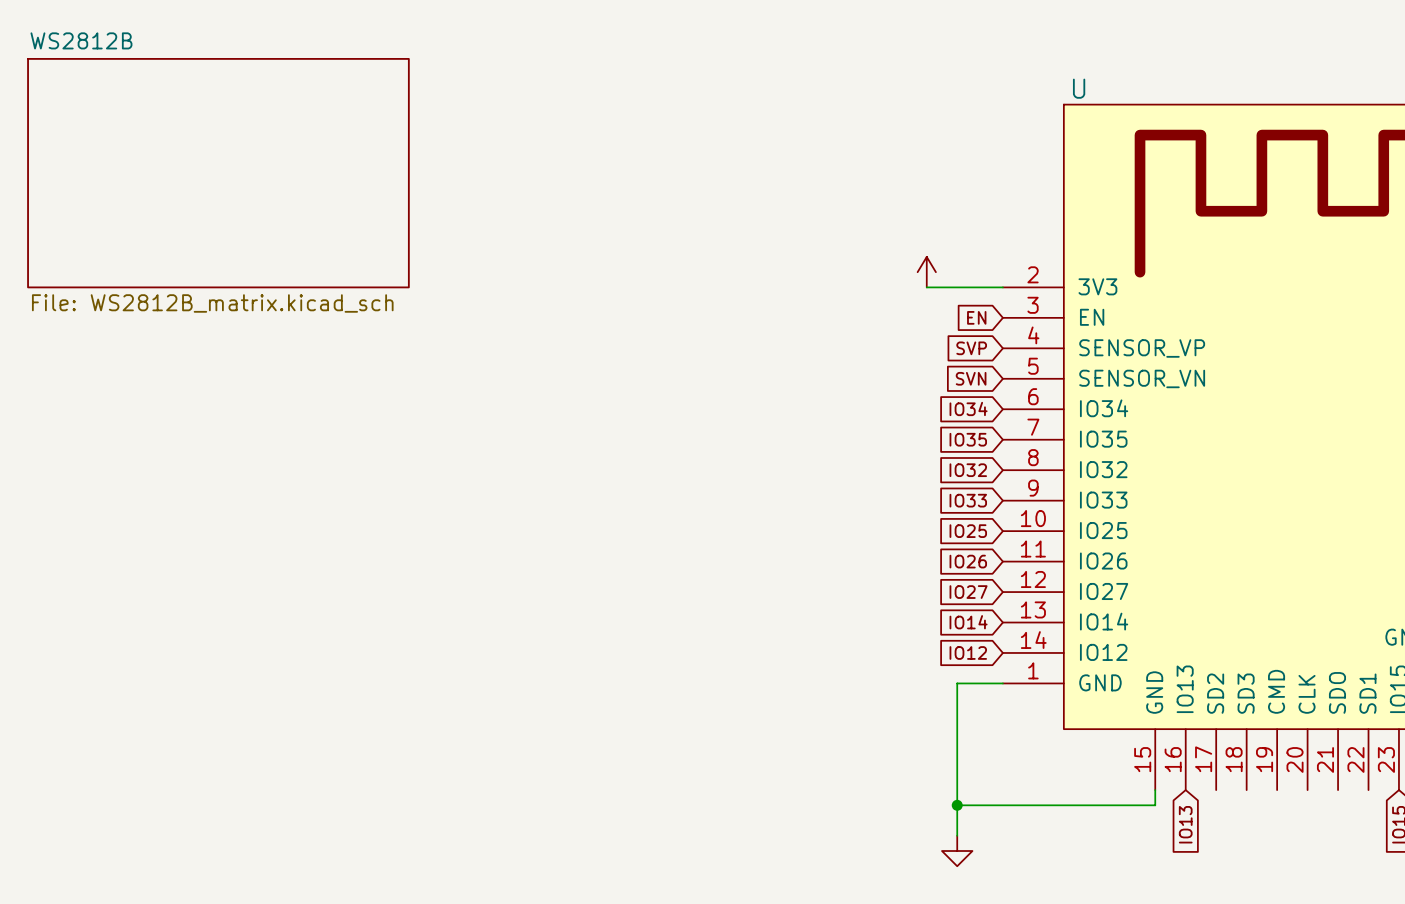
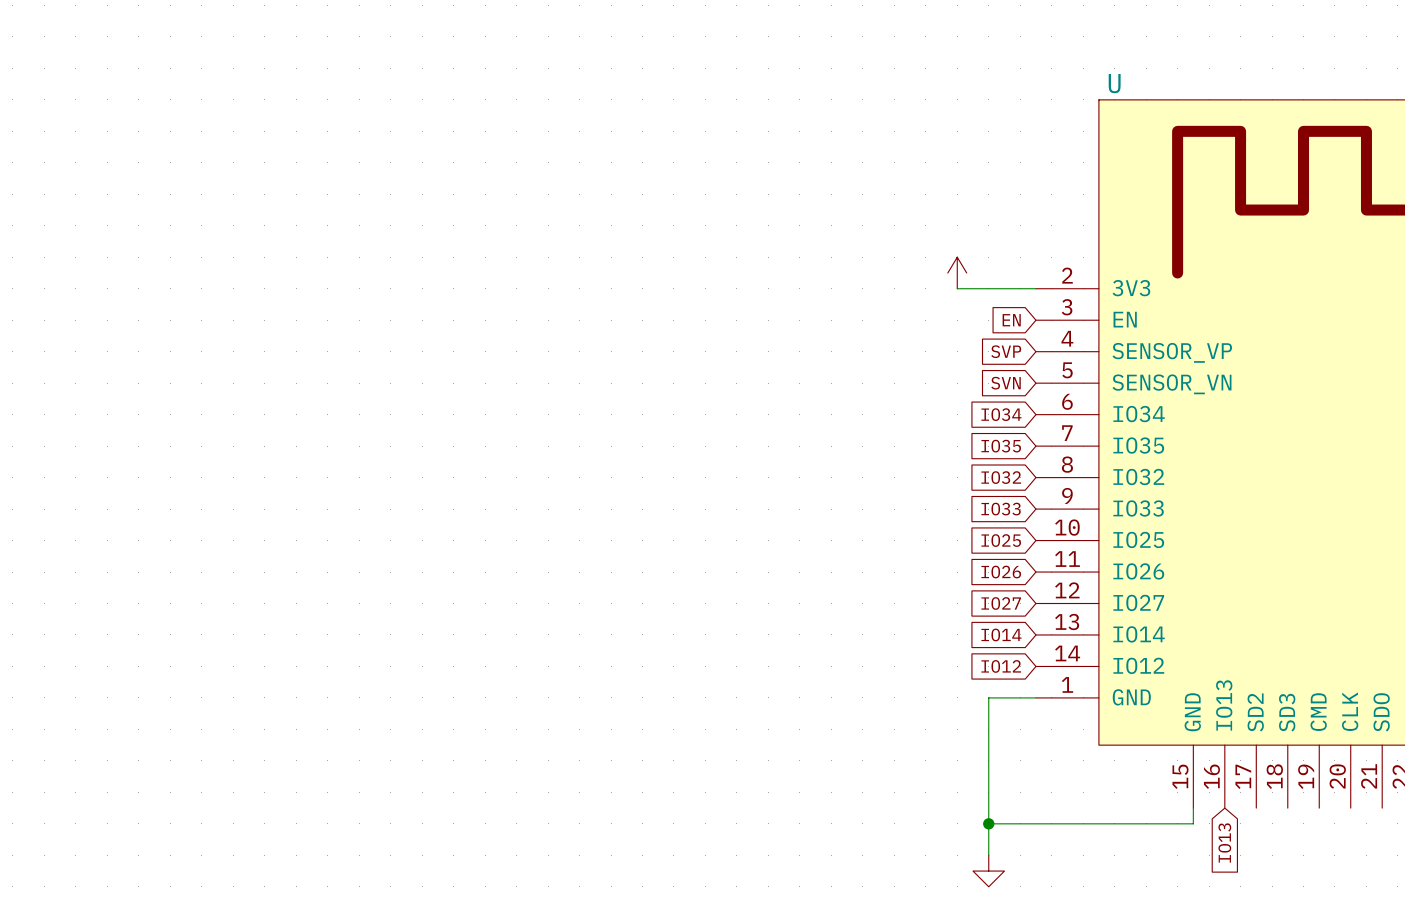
sheet WS2812B: File: WS2812B_matrix.kicad_sch (218, 173) -> none

